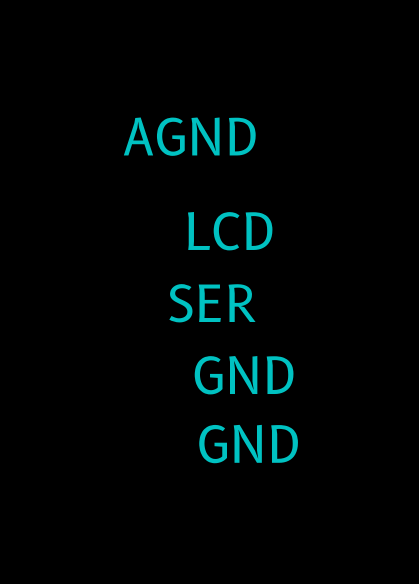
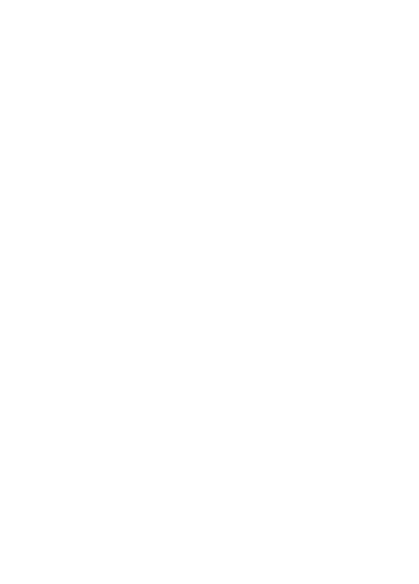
text: AGND (189, 136) -> none
text: LCD (230, 231) -> none
text: SER (212, 303) -> none
text: GND (244, 375) -> none
text: GND (248, 444) -> none

